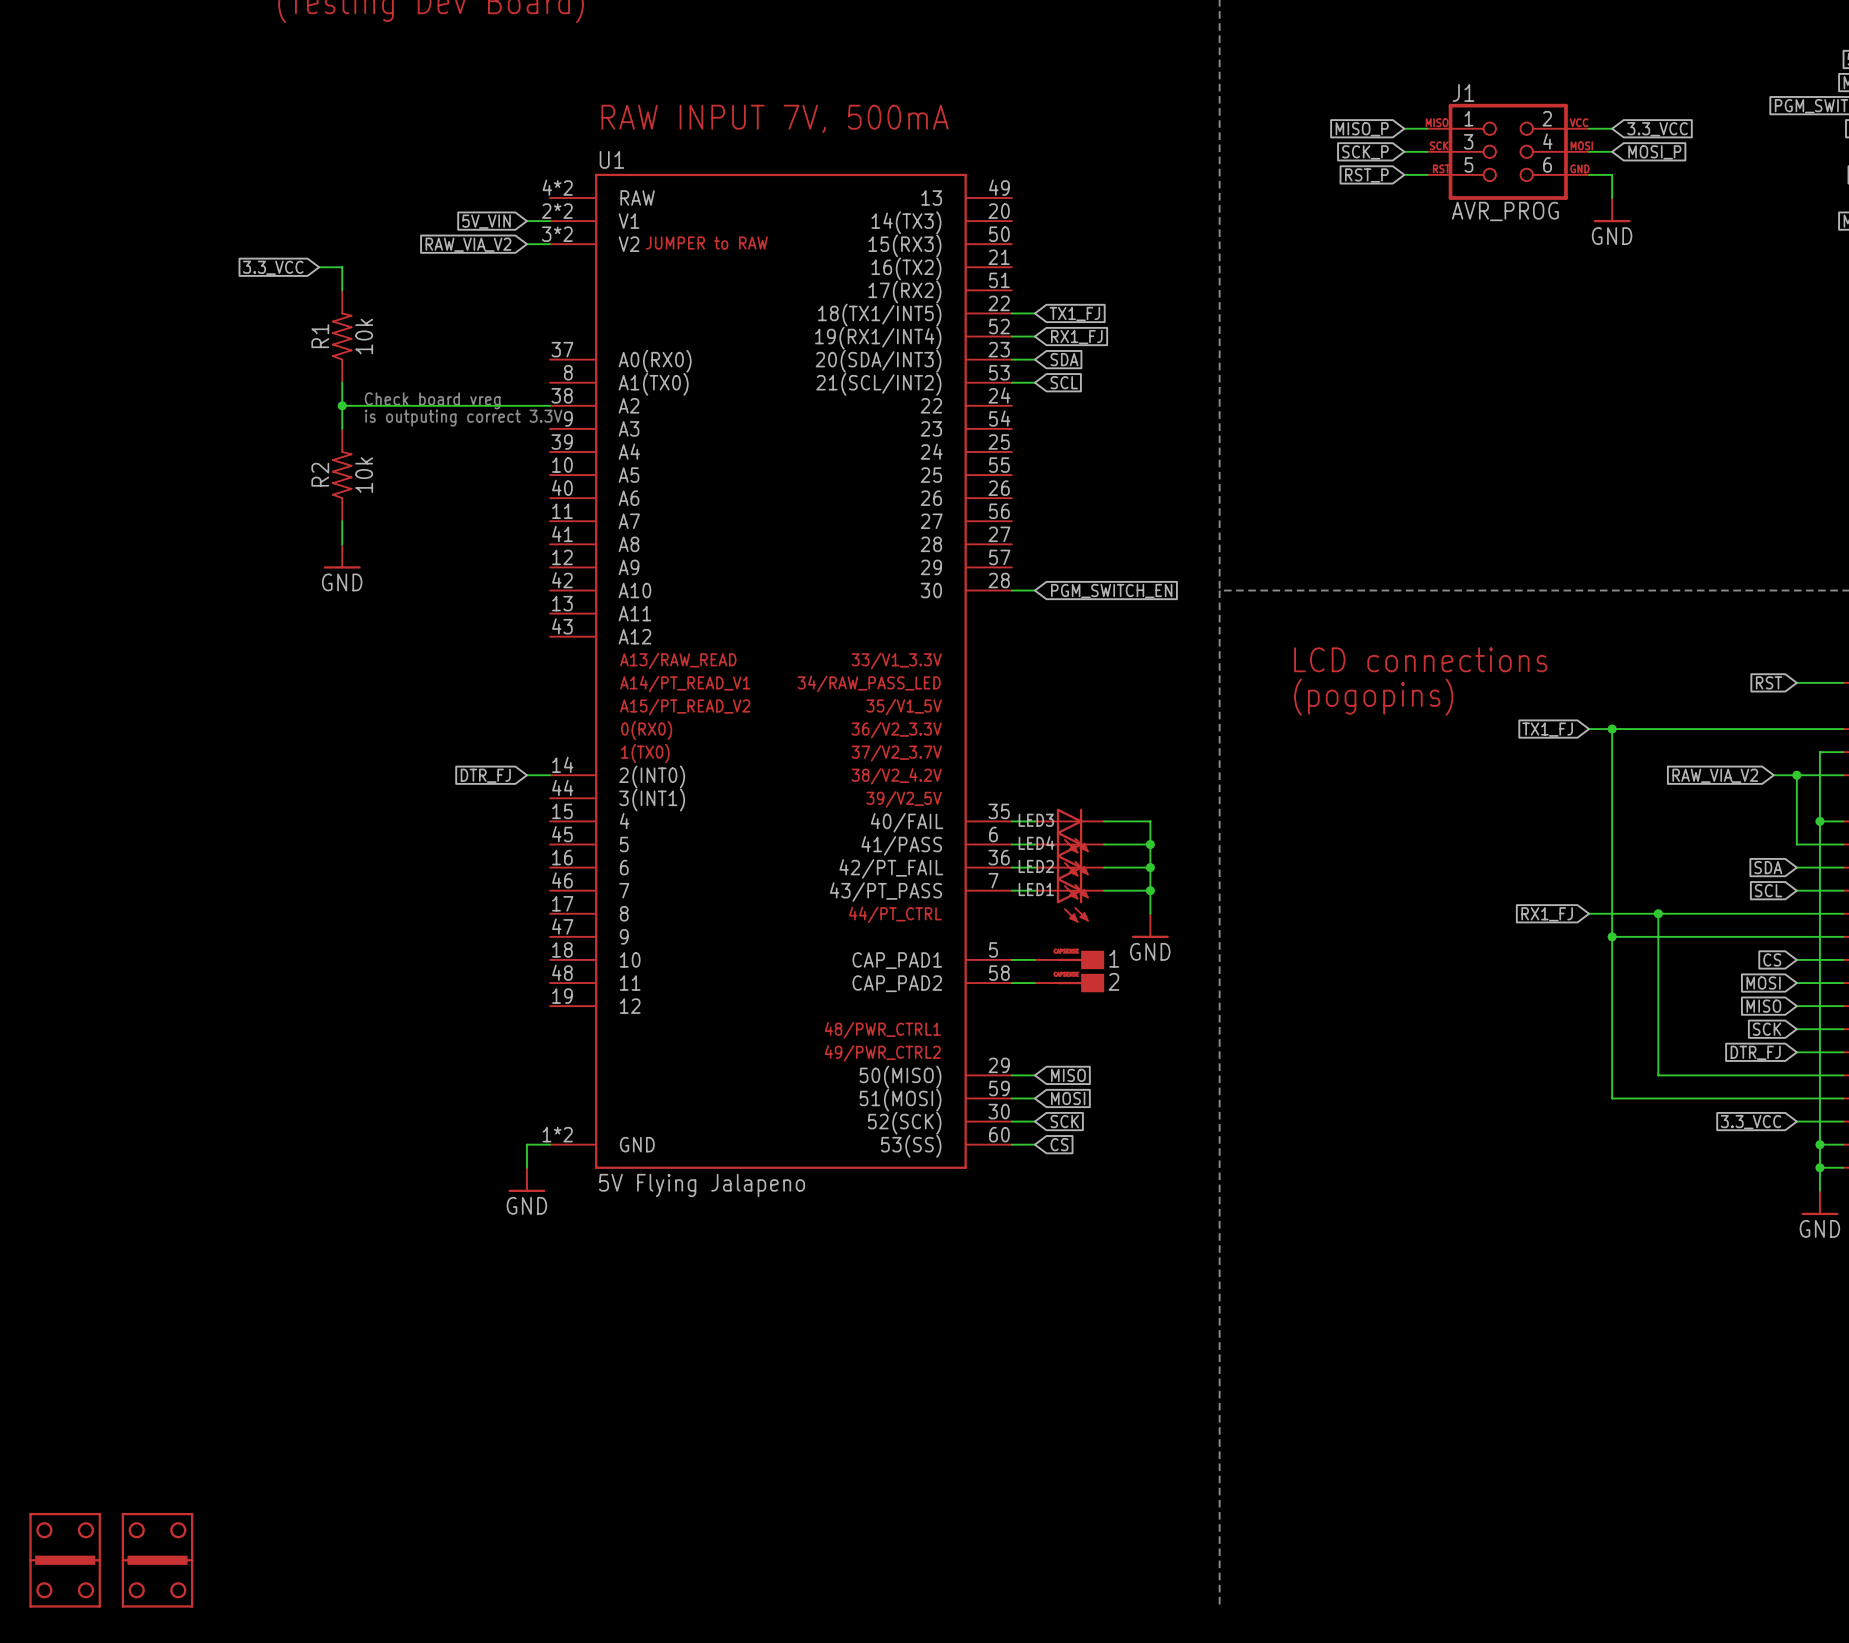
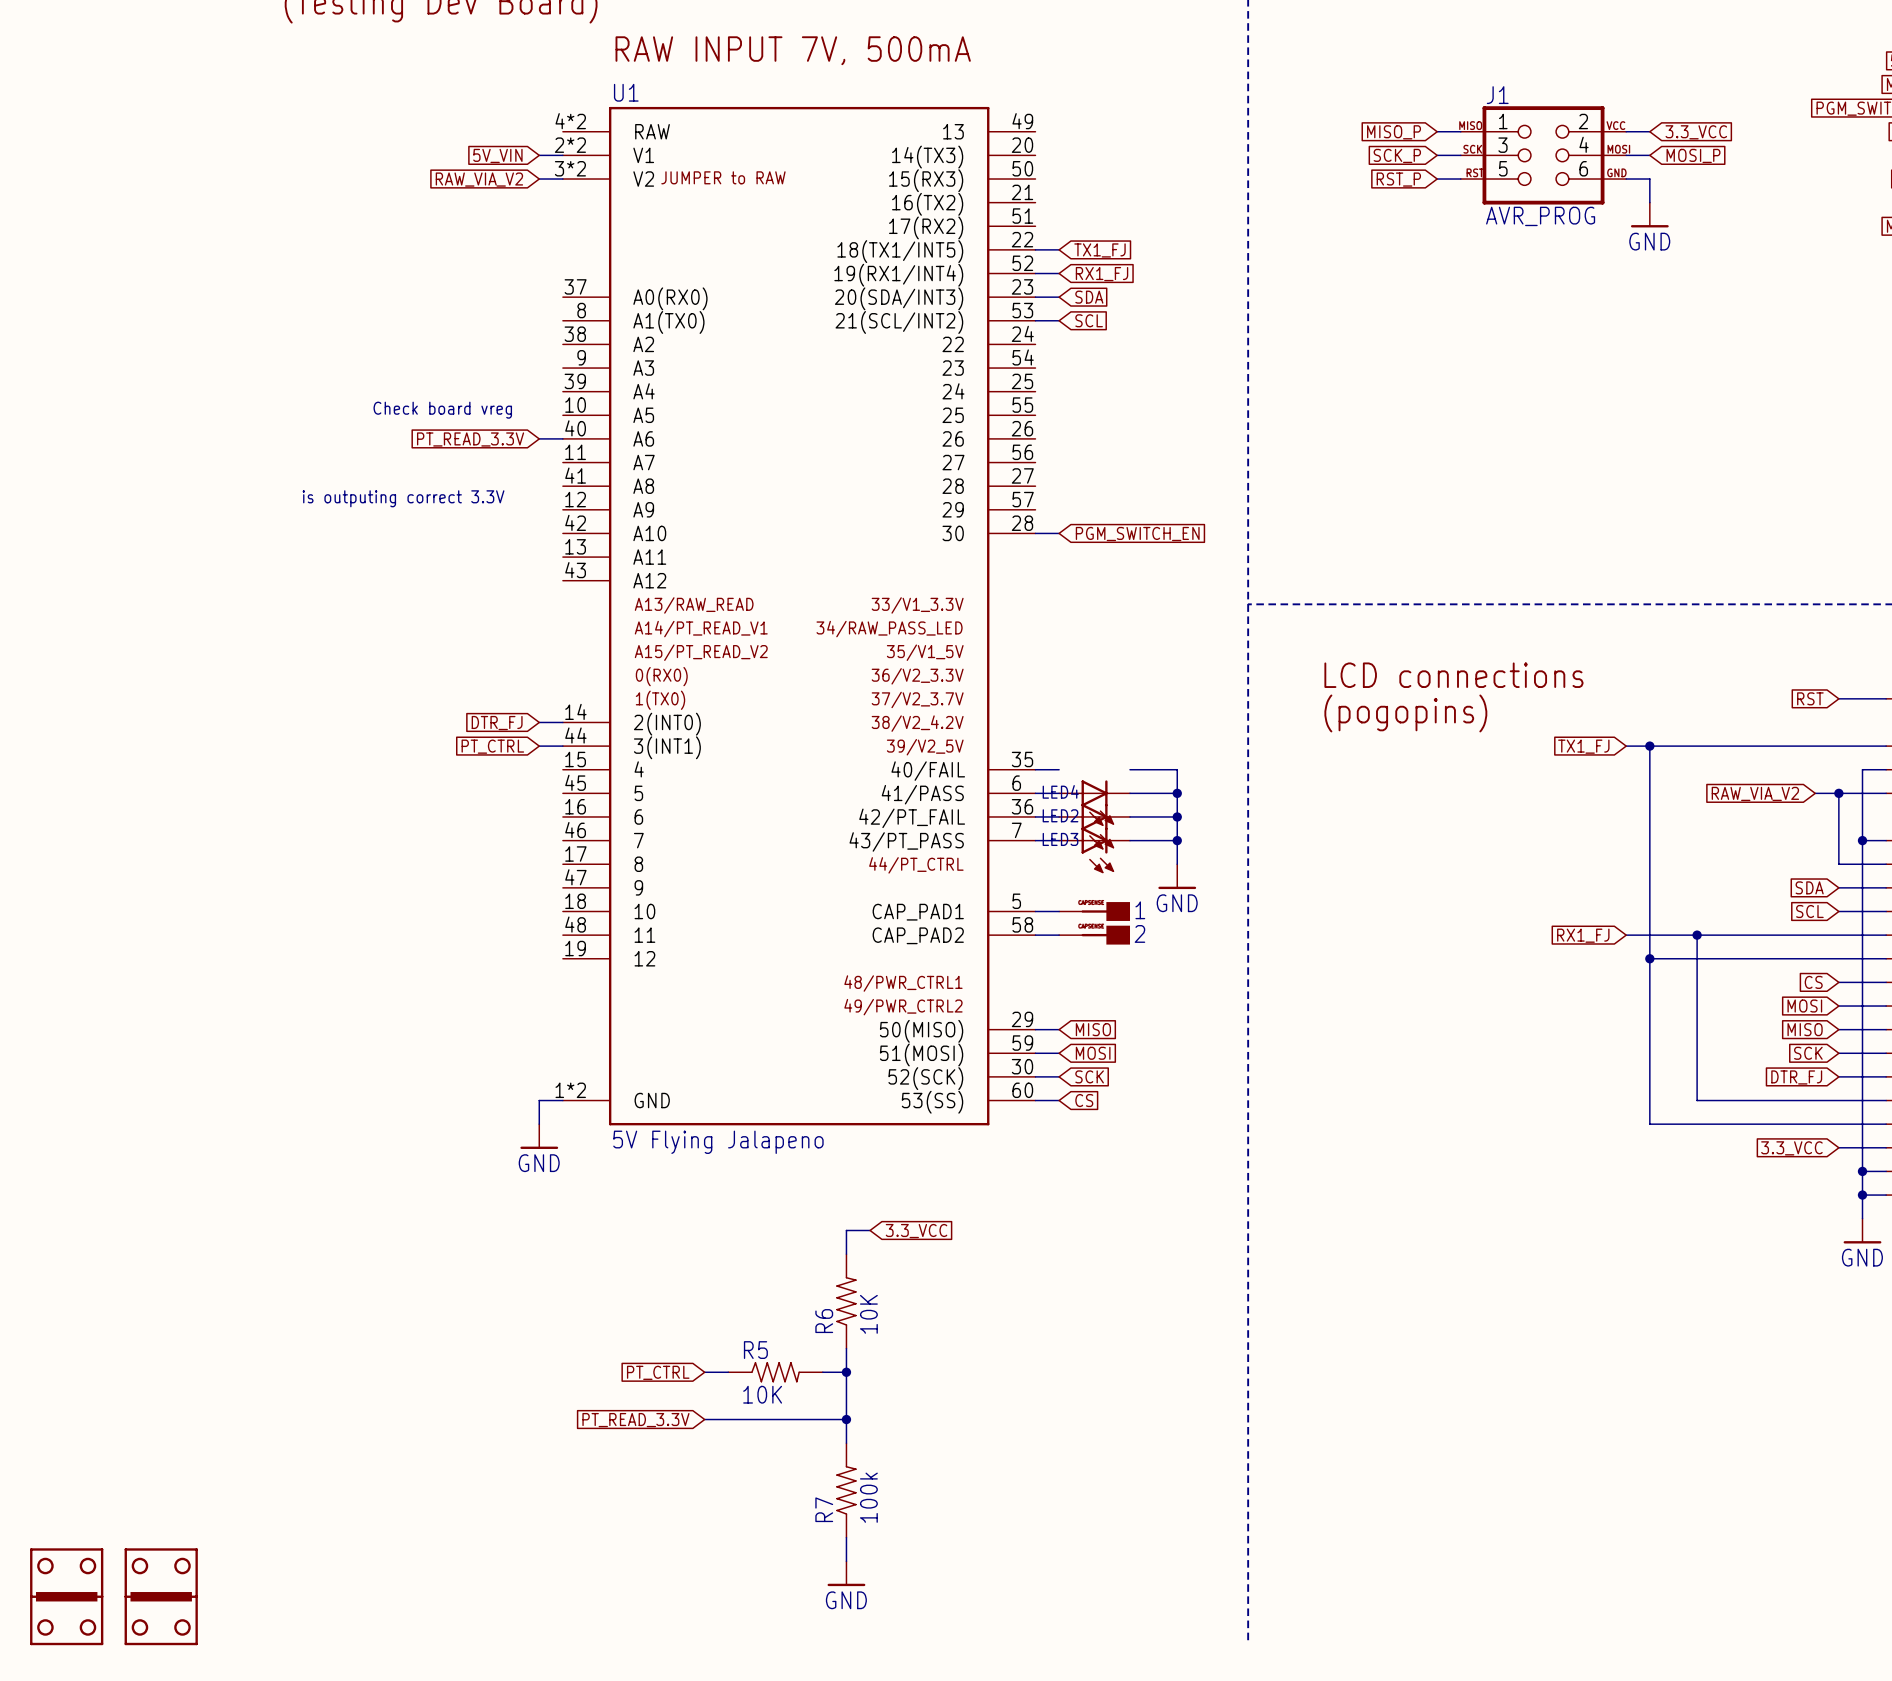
text position: RAW INPUT 7V, 500mA (775, 118) -> RAW INPUT 7V, 500mA (793, 50)
global label position: 5V_VIN (486, 221) -> 5V_VIN (497, 155)
wire: (526, 221) (550, 221) -> (539, 155) (562, 155)
text position: JUMPER to RAW (706, 243) -> JUMPER to RAW (723, 177)
global label position: RAW_VIA_V2 (468, 244) -> RAW_VIA_V2 (479, 179)
wire: (526, 244) (550, 244) -> (539, 179) (562, 179)
global label: none -> TX1_FJ (1099, 250)
global label: 3.3_VCC (273, 267) -> none
wire: (319, 267) (342, 267) (342, 290) -> none
global label: TX1_FJ (1074, 314) -> SCL (1089, 320)
R1: 10k (342, 336) -> none
wire: (1011, 336) (1034, 336) -> (1035, 273) (1059, 273)
global label position: RX1_FJ (1076, 337) -> RX1_FJ (1102, 274)
wire: (1011, 359) (1034, 359) -> (1035, 297) (1059, 297)
global label position: SDA (1064, 359) -> SDA (1089, 297)
wire: (342, 382) (342, 428) -> none
wire: (1011, 382) (1034, 382) -> (1035, 249) (1059, 249)
global label: SCL (1064, 382) -> none
wire: (342, 405) (550, 405) -> none
junction: (342, 405) -> none
text position: is outputing correct 3.3V (463, 418) -> is outputing correct 3.3V (403, 498)
wire: none -> (539, 438) (562, 438)
global label: none -> PT_READ_3.3V (470, 439)
R2: 10k (342, 475) -> none
wire: (342, 521) (342, 544) -> none
power symbol: GND (342, 556) -> none
wire: (1011, 590) (1034, 590) -> (1035, 533) (1059, 533)
global label position: PGM_SWITCH_EN (1111, 591) -> PGM_SWITCH_EN (1137, 534)
U1 position: (780, 671) -> (799, 616)
global label: none -> PT_CTRL (492, 746)
wire: none -> (539, 746) (562, 746)
wire: none -> (1035, 769) (1059, 769)
global label position: DTR_FJ (485, 775) -> DTR_FJ (497, 723)
wire: (526, 775) (550, 775) -> (539, 722) (562, 722)
junction: none -> (1177, 793)
junction: none -> (1177, 816)
junction: none -> (1177, 840)
wire: (1011, 844) (1034, 844) -> (1035, 793) (1059, 793)
wire: (1104, 844) (1150, 844) (1150, 913) -> (1130, 769) (1177, 769) (1177, 840)
junction: (1150, 844) -> none
LED4 position: (1069, 854) -> (1094, 803)
wire: (1011, 867) (1034, 867) -> (1035, 816) (1059, 816)
wire: (1104, 867) (1150, 867) -> (1130, 816) (1177, 816)
junction: (1150, 867) -> none
LED2 position: (1069, 877) -> (1094, 826)
wire: (1104, 890) (1150, 890) -> (1130, 793) (1177, 793)
junction: (1150, 890) -> none
LED1: (1069, 900) -> none
power symbol position: GND (1150, 925) -> GND (1177, 876)
wire: (1011, 959) (1034, 959) -> (1035, 1029) (1059, 1029)
1 position: (1069, 959) -> (1094, 911)
wire: (1011, 983) (1034, 983) -> (1035, 935) (1059, 935)
2 position: (1069, 983) -> (1094, 935)
global label: none -> MISO (1093, 1029)
global label: MISO (1068, 1075) -> CS (1084, 1100)
wire: (1011, 1098) (1034, 1098) -> (1035, 1053) (1059, 1053)
global label position: MOSI (1068, 1098) -> MOSI (1093, 1053)
wire: (1011, 1121) (1034, 1121) -> (1035, 1076) (1059, 1076)
global label position: SCK (1064, 1121) -> SCK (1089, 1076)
wire: (550, 1144) (526, 1144) (526, 1167) -> (562, 1100) (539, 1100) (539, 1124)
wire: (1011, 1144) (1034, 1144) -> none
global label: CS (1059, 1144) -> none
power symbol position: GND (526, 1179) -> GND (539, 1136)
wire: none -> (870, 1230) (846, 1230) (846, 1254)
global label: none -> 3.3_VCC (916, 1231)
R6: none -> 10K (846, 1301)
wire: none -> (846, 1348) (846, 1443)
wire: none -> (704, 1372) (728, 1372)
R5: none -> 10K (775, 1372)
wire: none -> (822, 1372) (846, 1372)
junction: none -> (846, 1372)
global label: none -> PT_CTRL (658, 1372)
global label: none -> PT_READ_3.3V (635, 1420)
wire: none -> (704, 1419) (846, 1419)
junction: none -> (846, 1419)
R7: none -> 100k (846, 1490)
wire: none -> (846, 1537) (846, 1561)
power symbol: none -> GND (846, 1573)

